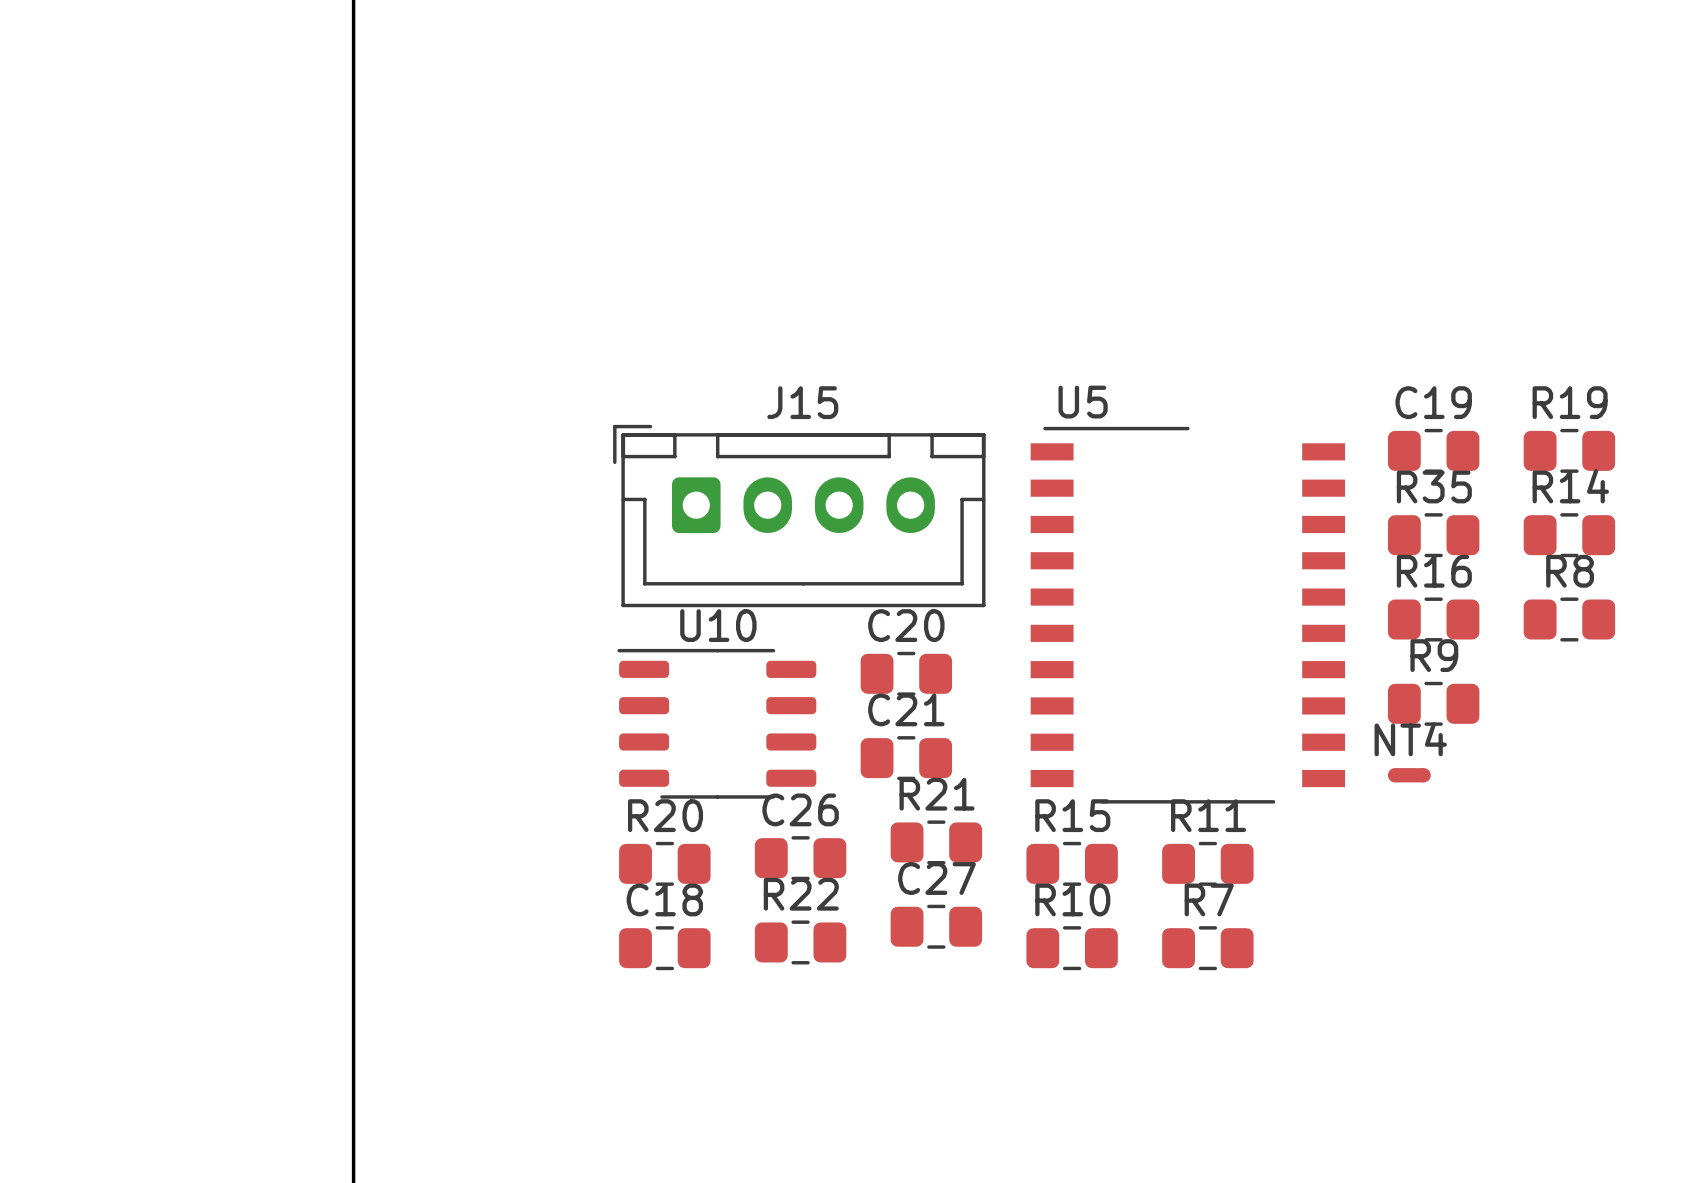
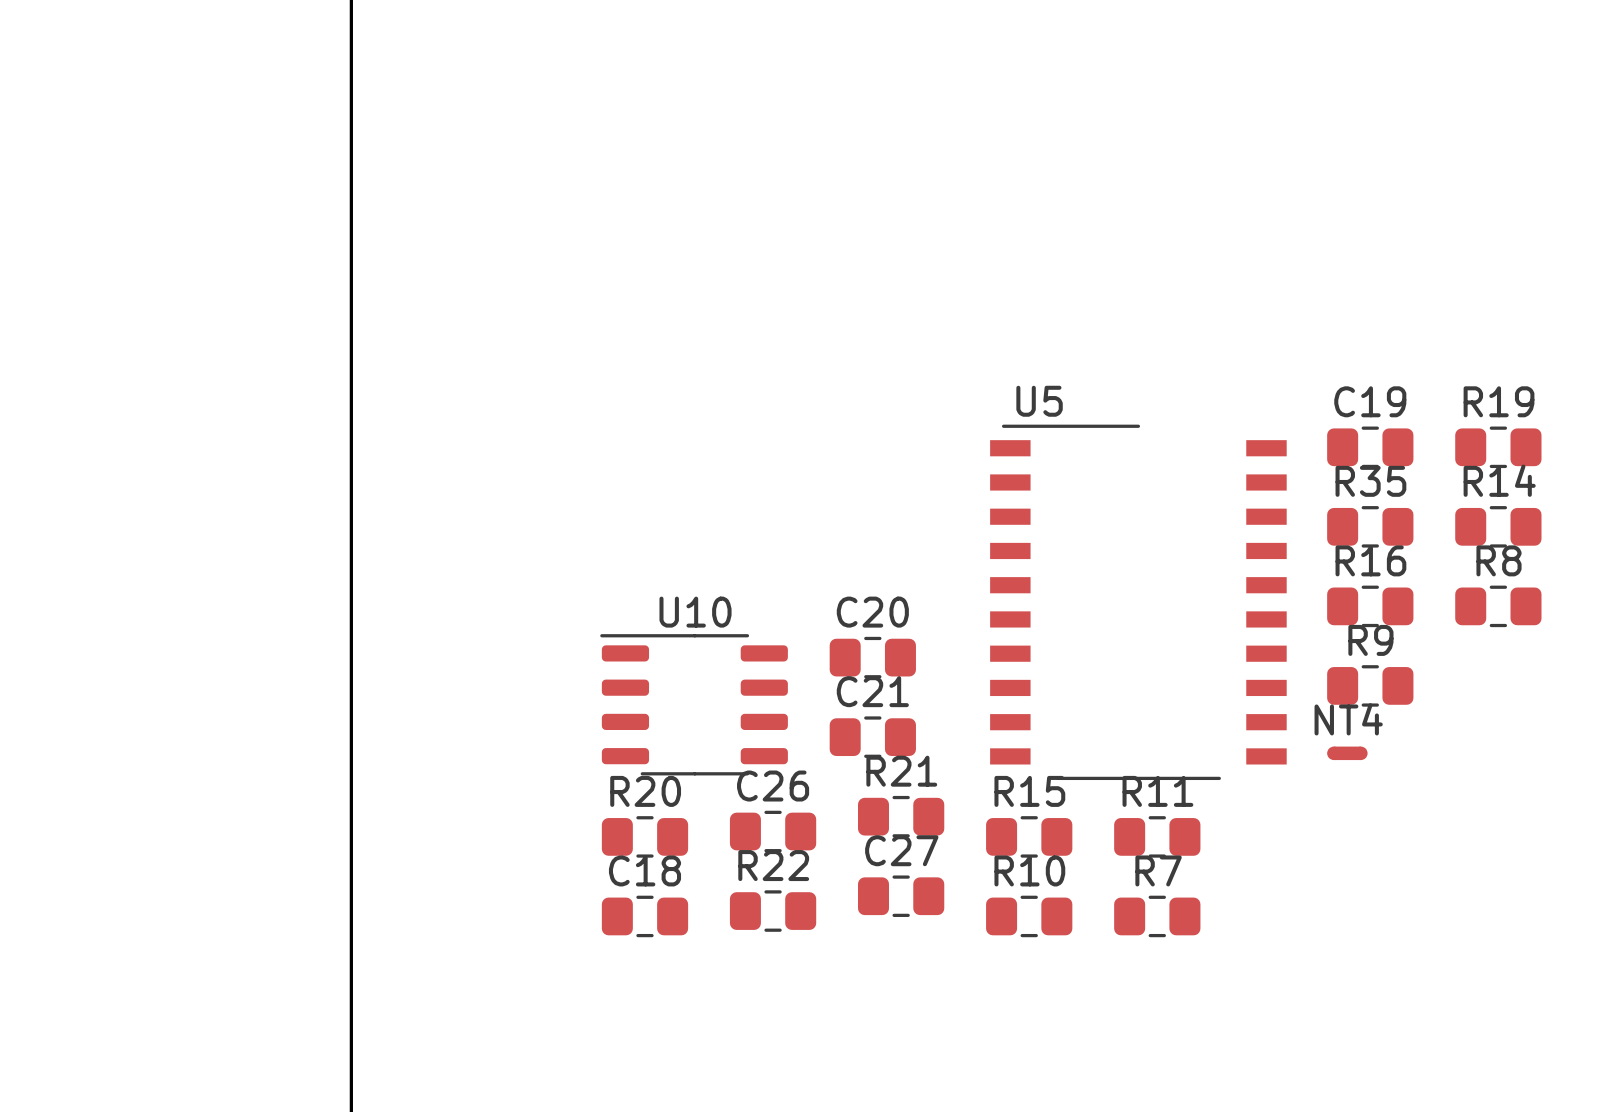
J15: (799, 516) -> none

